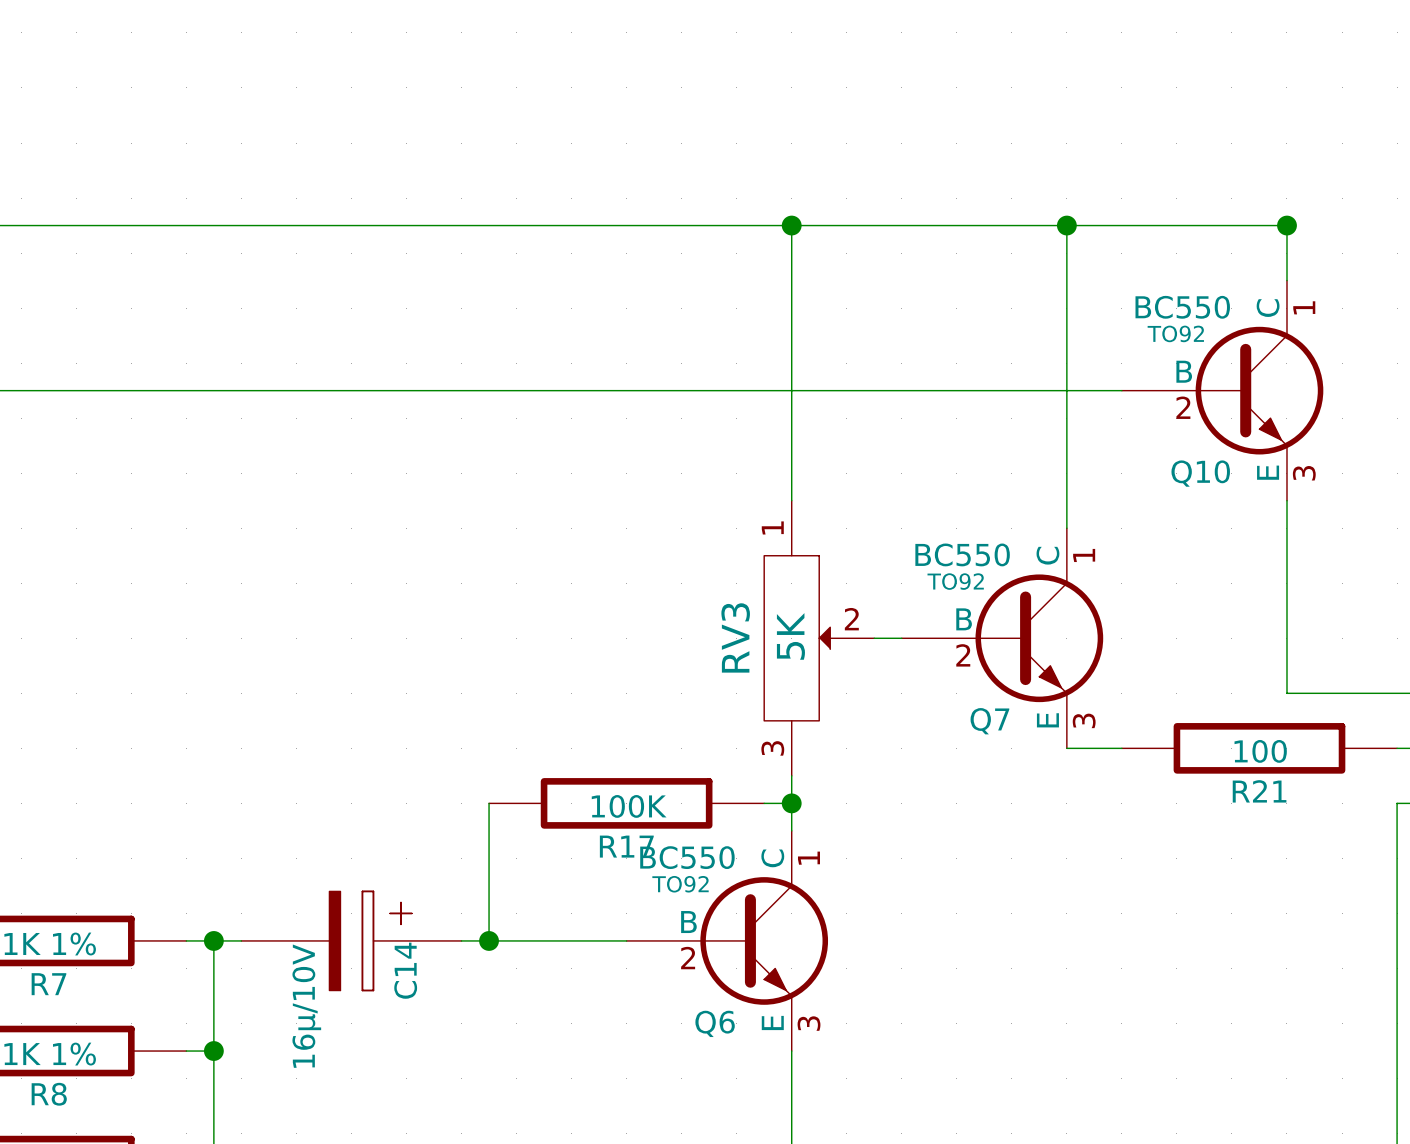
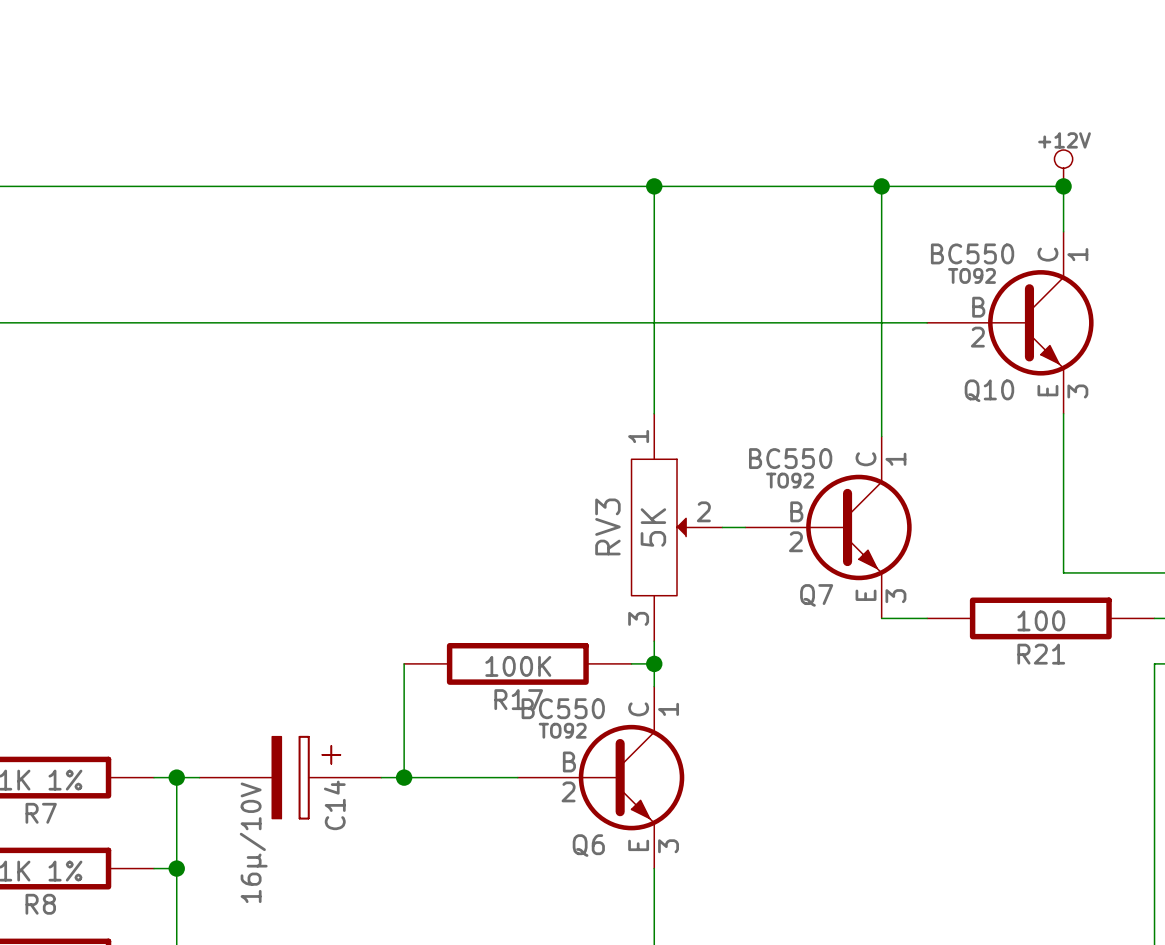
power symbol: none -> +12V (1063, 168)

